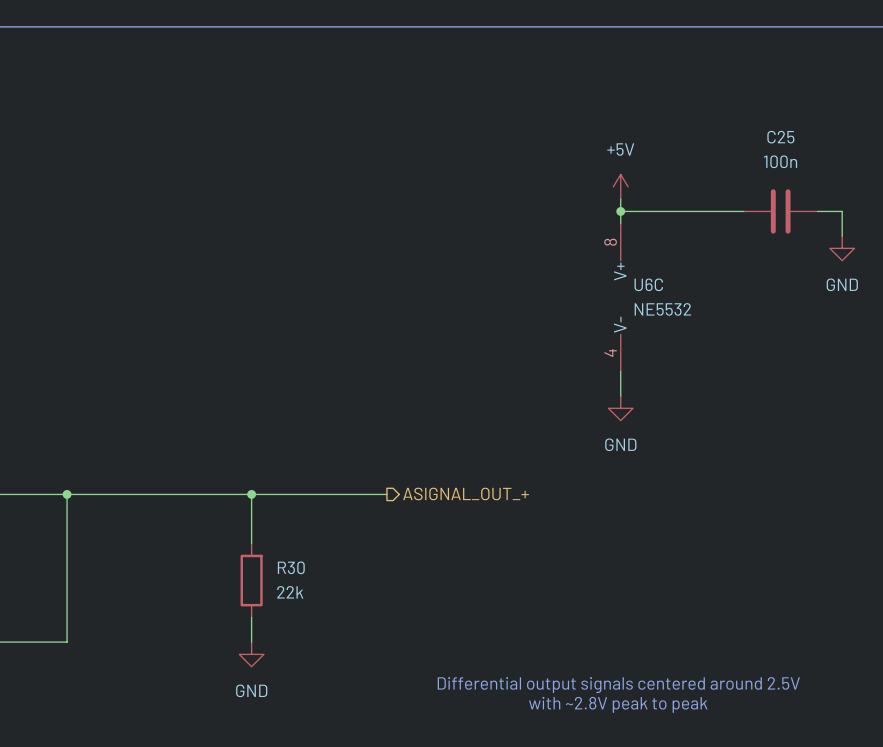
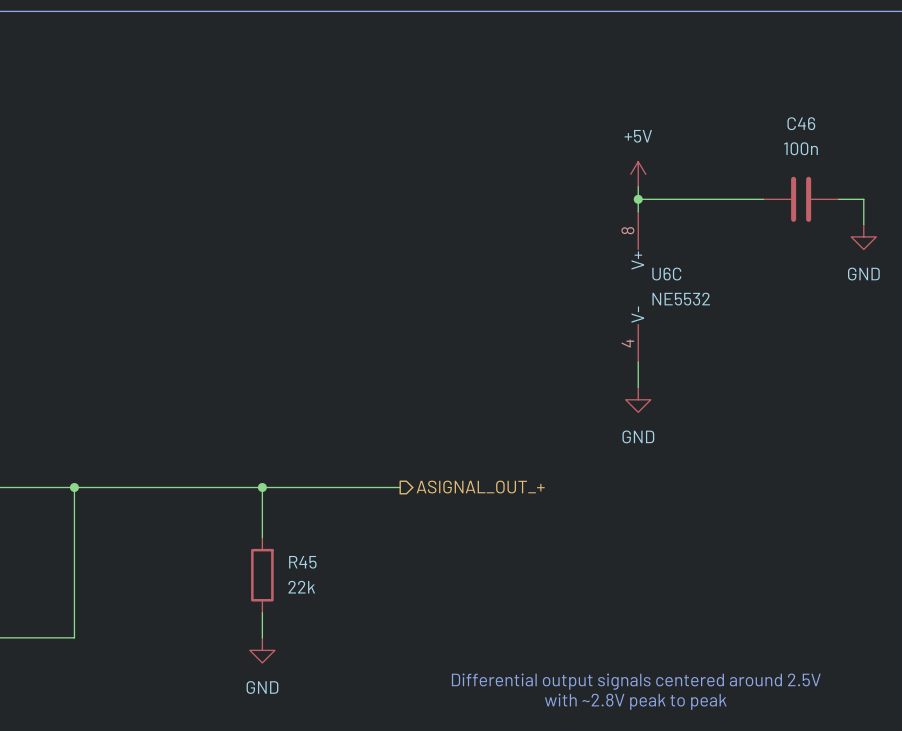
C25 name: C25 (780, 137) -> C46 (801, 123)
R30 name: R30 (291, 567) -> R45 (302, 562)

